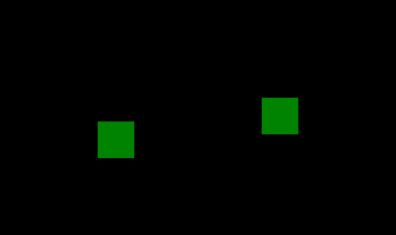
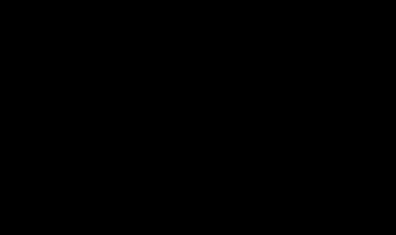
part: (280, 115) -> none
part: (115, 139) -> none

